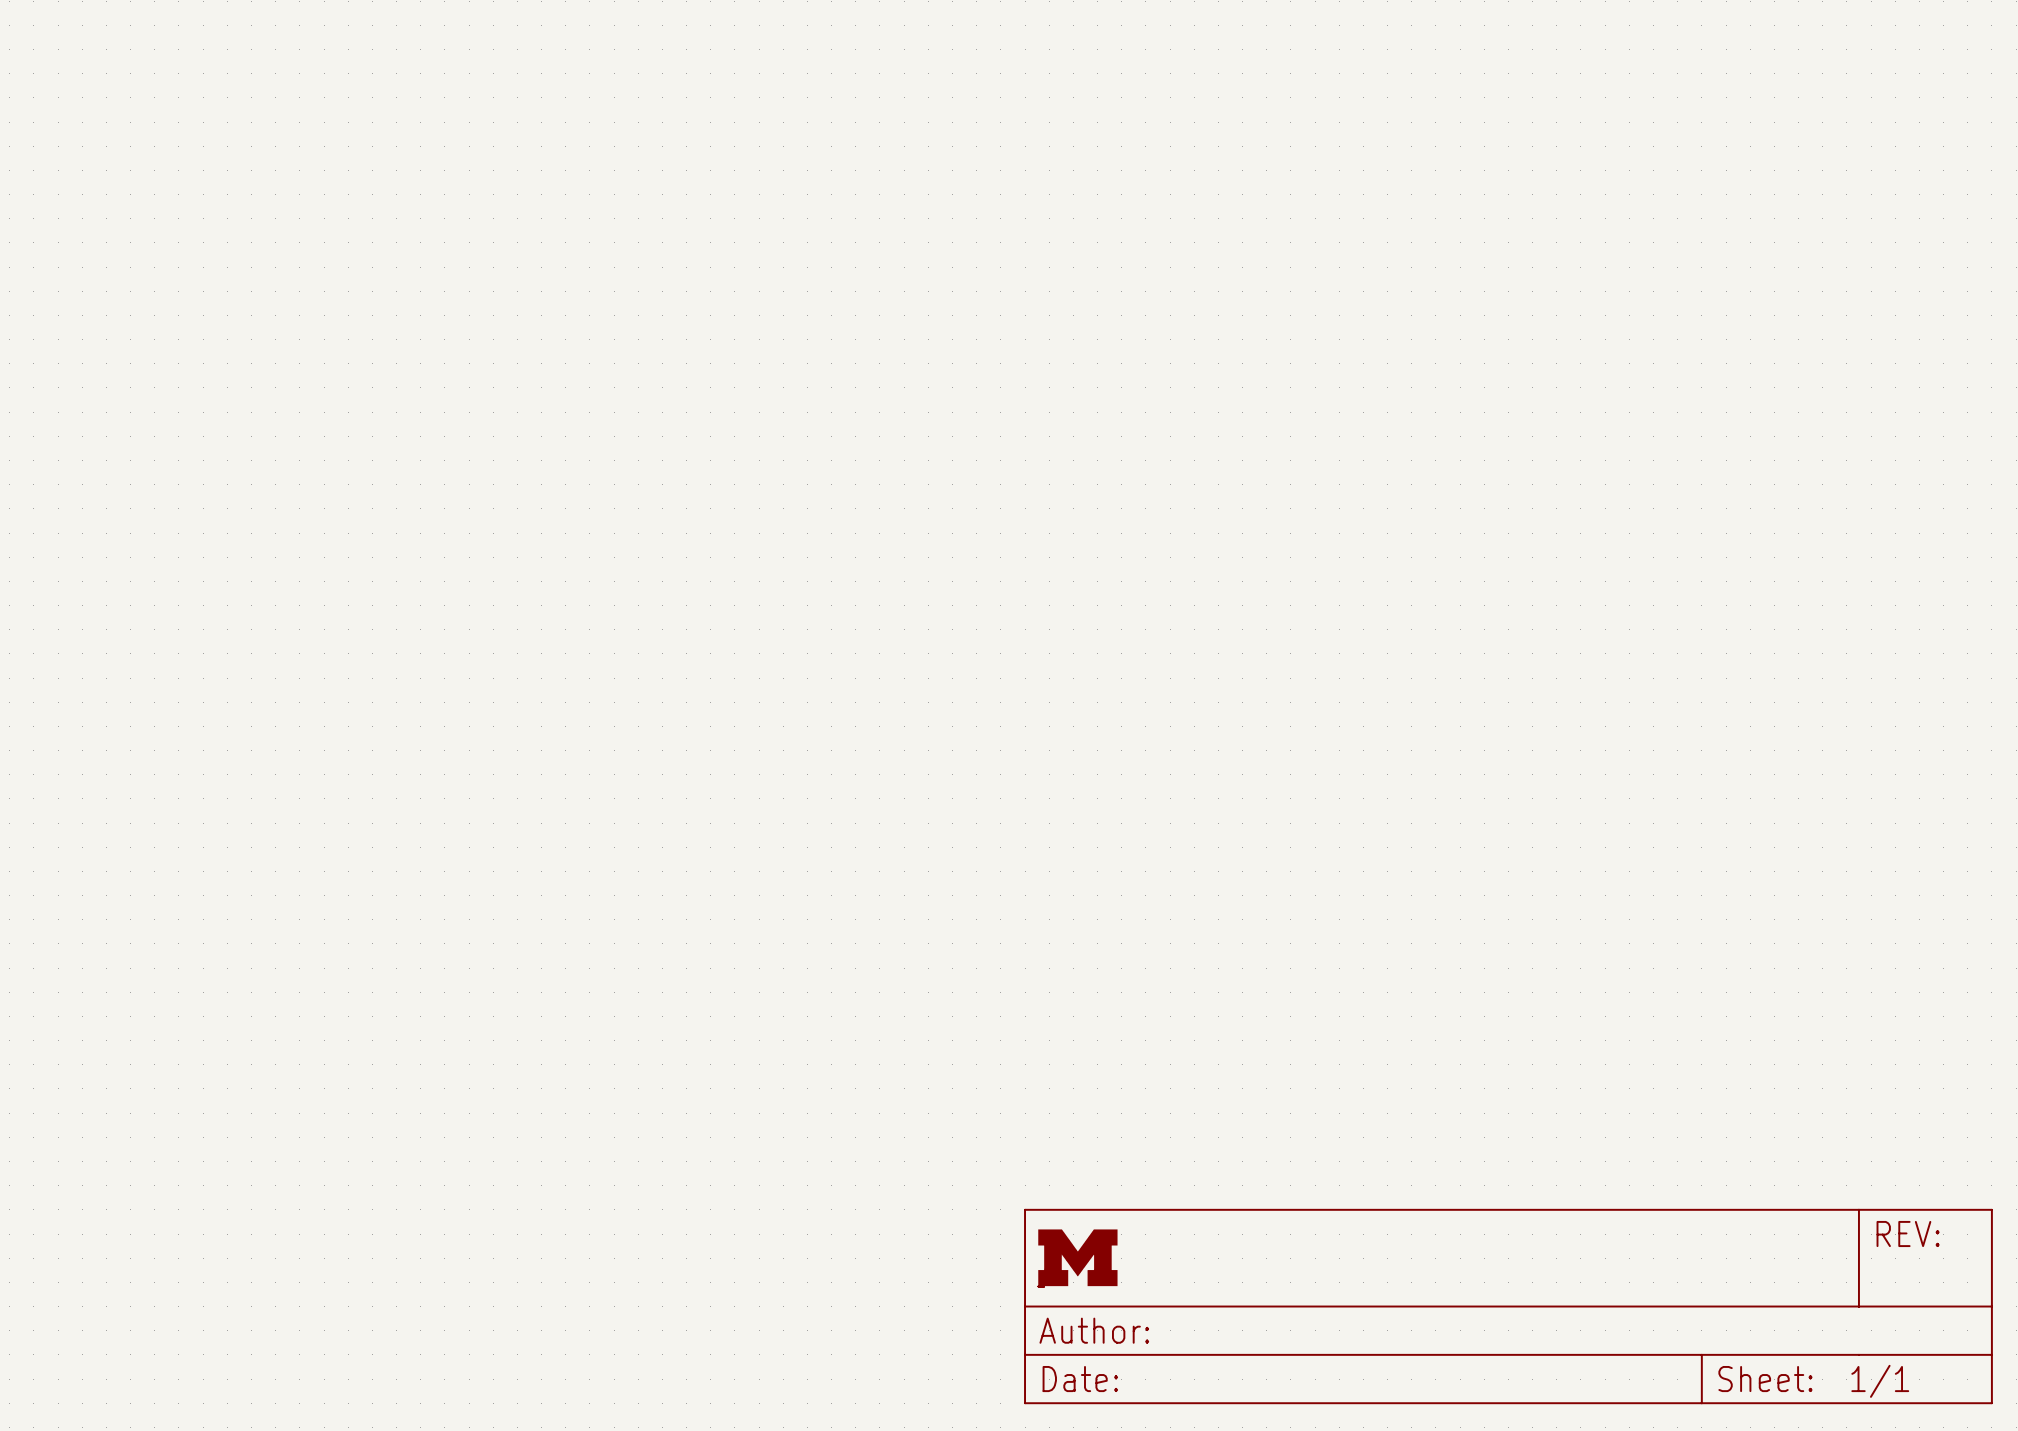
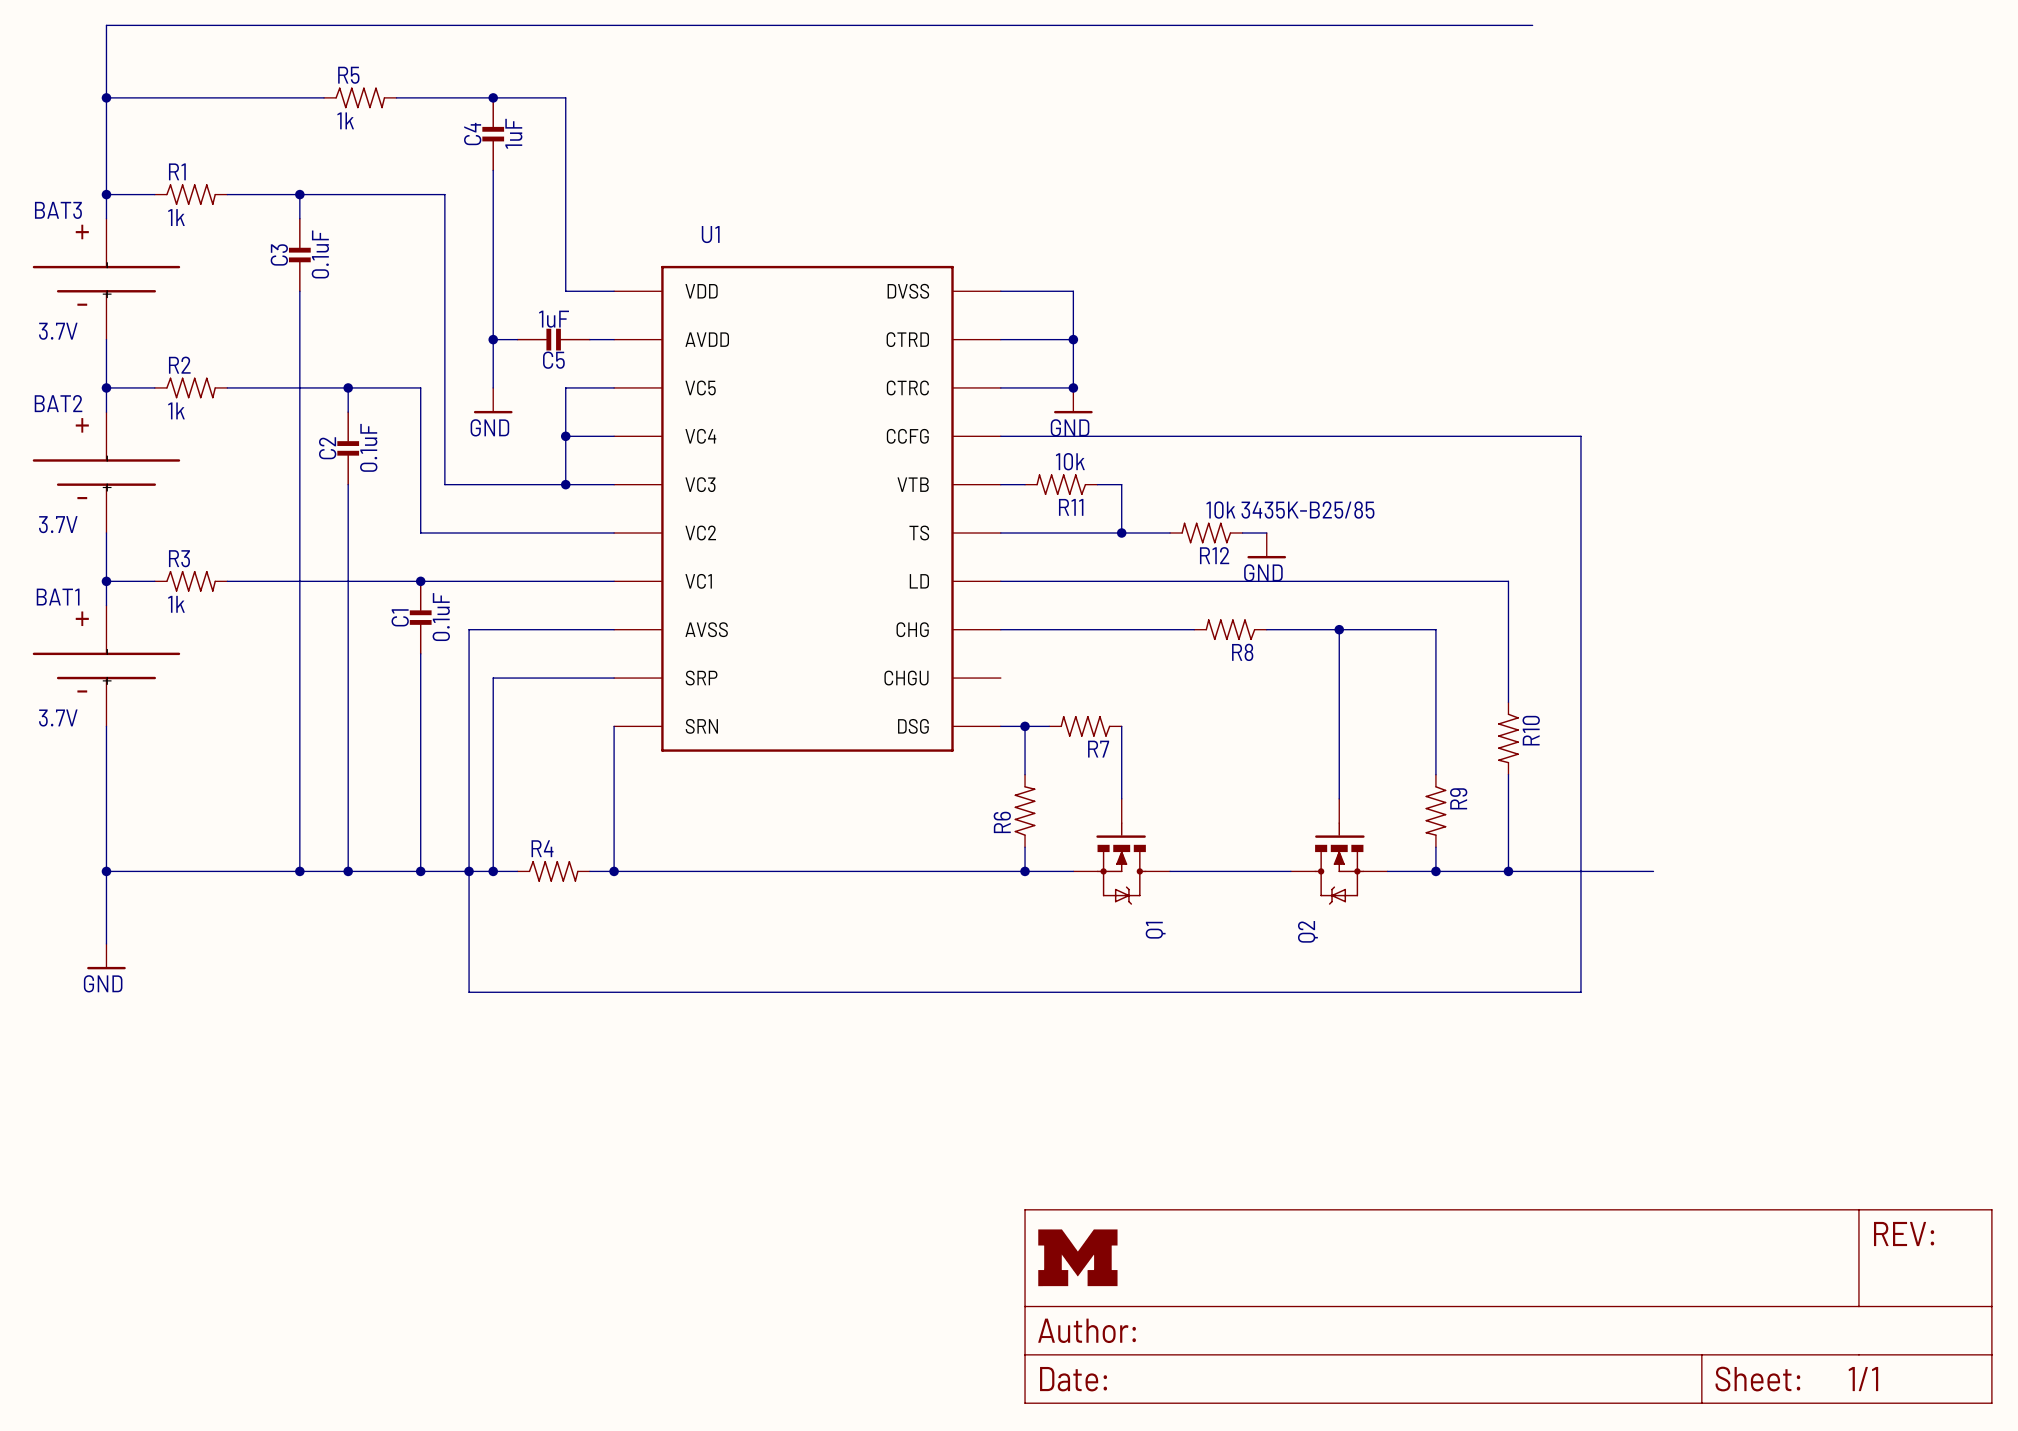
wire: none -> (1532, 25) (106, 25) (106, 218)
wire: none -> (106, 97) (324, 97)
junction: none -> (106, 97)
R5: none -> 1k (360, 97)
wire: none -> (396, 97) (565, 97) (565, 291) (614, 291)
junction: none -> (493, 97)
C4: none -> 1uF (493, 134)
wire: none -> (493, 170) (493, 387)
wire: none -> (106, 194) (154, 194)
junction: none -> (106, 194)
R1: none -> 1k (191, 194)
wire: none -> (227, 194) (444, 194) (444, 484) (614, 484)
wire: none -> (299, 194) (299, 218)
junction: none -> (299, 194)
C3: none -> 0.1uF (299, 255)
BAT3: none -> 3.7V (106, 279)
wire: none -> (299, 291) (299, 871)
wire: none -> (1000, 291) (1073, 291) (1073, 387) (1000, 387)
wire: none -> (106, 339) (106, 412)
wire: none -> (493, 339) (517, 339)
junction: none -> (493, 339)
C5: none -> 1uF (553, 339)
wire: none -> (589, 339) (614, 339)
wire: none -> (1000, 339) (1073, 339)
junction: none -> (1073, 339)
wire: none -> (106, 387) (154, 387)
junction: none -> (106, 387)
R2: none -> 1k (191, 387)
wire: none -> (227, 387) (420, 387) (420, 533) (614, 533)
wire: none -> (348, 387) (348, 412)
junction: none -> (348, 387)
wire: none -> (614, 387) (565, 387) (565, 484)
junction: none -> (1073, 387)
power symbol: none -> GND (493, 400)
power symbol: none -> GND (1073, 400)
wire: none -> (565, 436) (614, 436)
junction: none -> (565, 436)
wire: none -> (1000, 436) (1580, 436) (1580, 992) (469, 992) (469, 629) (614, 629)
C2: none -> 0.1uF (348, 448)
BAT2: none -> 3.7V (106, 472)
wire: none -> (348, 484) (348, 871)
junction: none -> (565, 484)
wire: none -> (1000, 484) (1025, 484)
R11: none -> 10k (1061, 484)
wire: none -> (1097, 484) (1121, 484) (1121, 533)
U1: none -> (807, 508)
wire: none -> (106, 533) (106, 605)
wire: none -> (1000, 533) (1170, 533)
junction: none -> (1121, 533)
R12: none -> 10k 3435K-B25/85 (1206, 533)
wire: none -> (1242, 533) (1266, 533)
power symbol: none -> GND (1266, 545)
wire: none -> (106, 581) (154, 581)
junction: none -> (106, 581)
R3: none -> 1k (191, 581)
wire: none -> (227, 581) (614, 581)
junction: none -> (420, 581)
wire: none -> (1000, 581) (1508, 581) (1508, 702)
C1: none -> 0.1uF (420, 617)
wire: none -> (1000, 629) (1194, 629)
R8: none -> (1230, 629)
wire: none -> (1266, 629) (1435, 629) (1435, 774)
wire: none -> (1339, 629) (1339, 798)
junction: none -> (1339, 629)
wire: none -> (420, 653) (420, 871)
BAT1: none -> 3.7V (106, 665)
wire: none -> (614, 678) (493, 678) (493, 871)
wire: none -> (106, 726) (106, 943)
wire: none -> (614, 726) (614, 871)
wire: none -> (1000, 726) (1049, 726)
wire: none -> (1025, 726) (1025, 774)
junction: none -> (1025, 726)
R7: none -> (1085, 726)
wire: none -> (1121, 726) (1121, 798)
R10: none -> (1508, 738)
wire: none -> (1508, 774) (1508, 871)
R6: none -> (1025, 810)
R9: none -> (1435, 810)
wire: none -> (1025, 847) (1025, 871)
wire: none -> (1435, 847) (1435, 871)
Q1: none -> (1121, 851)
Q2: none -> (1339, 851)
wire: none -> (106, 871) (517, 871)
junction: none -> (106, 871)
junction: none -> (299, 871)
junction: none -> (348, 871)
junction: none -> (420, 871)
junction: none -> (469, 871)
junction: none -> (493, 871)
R4: none -> (553, 871)
wire: none -> (589, 871) (1073, 871)
junction: none -> (614, 871)
junction: none -> (1025, 871)
wire: none -> (1170, 871) (1290, 871)
wire: none -> (1387, 871) (1653, 871)
junction: none -> (1435, 871)
junction: none -> (1508, 871)
power symbol: none -> GND (106, 956)

